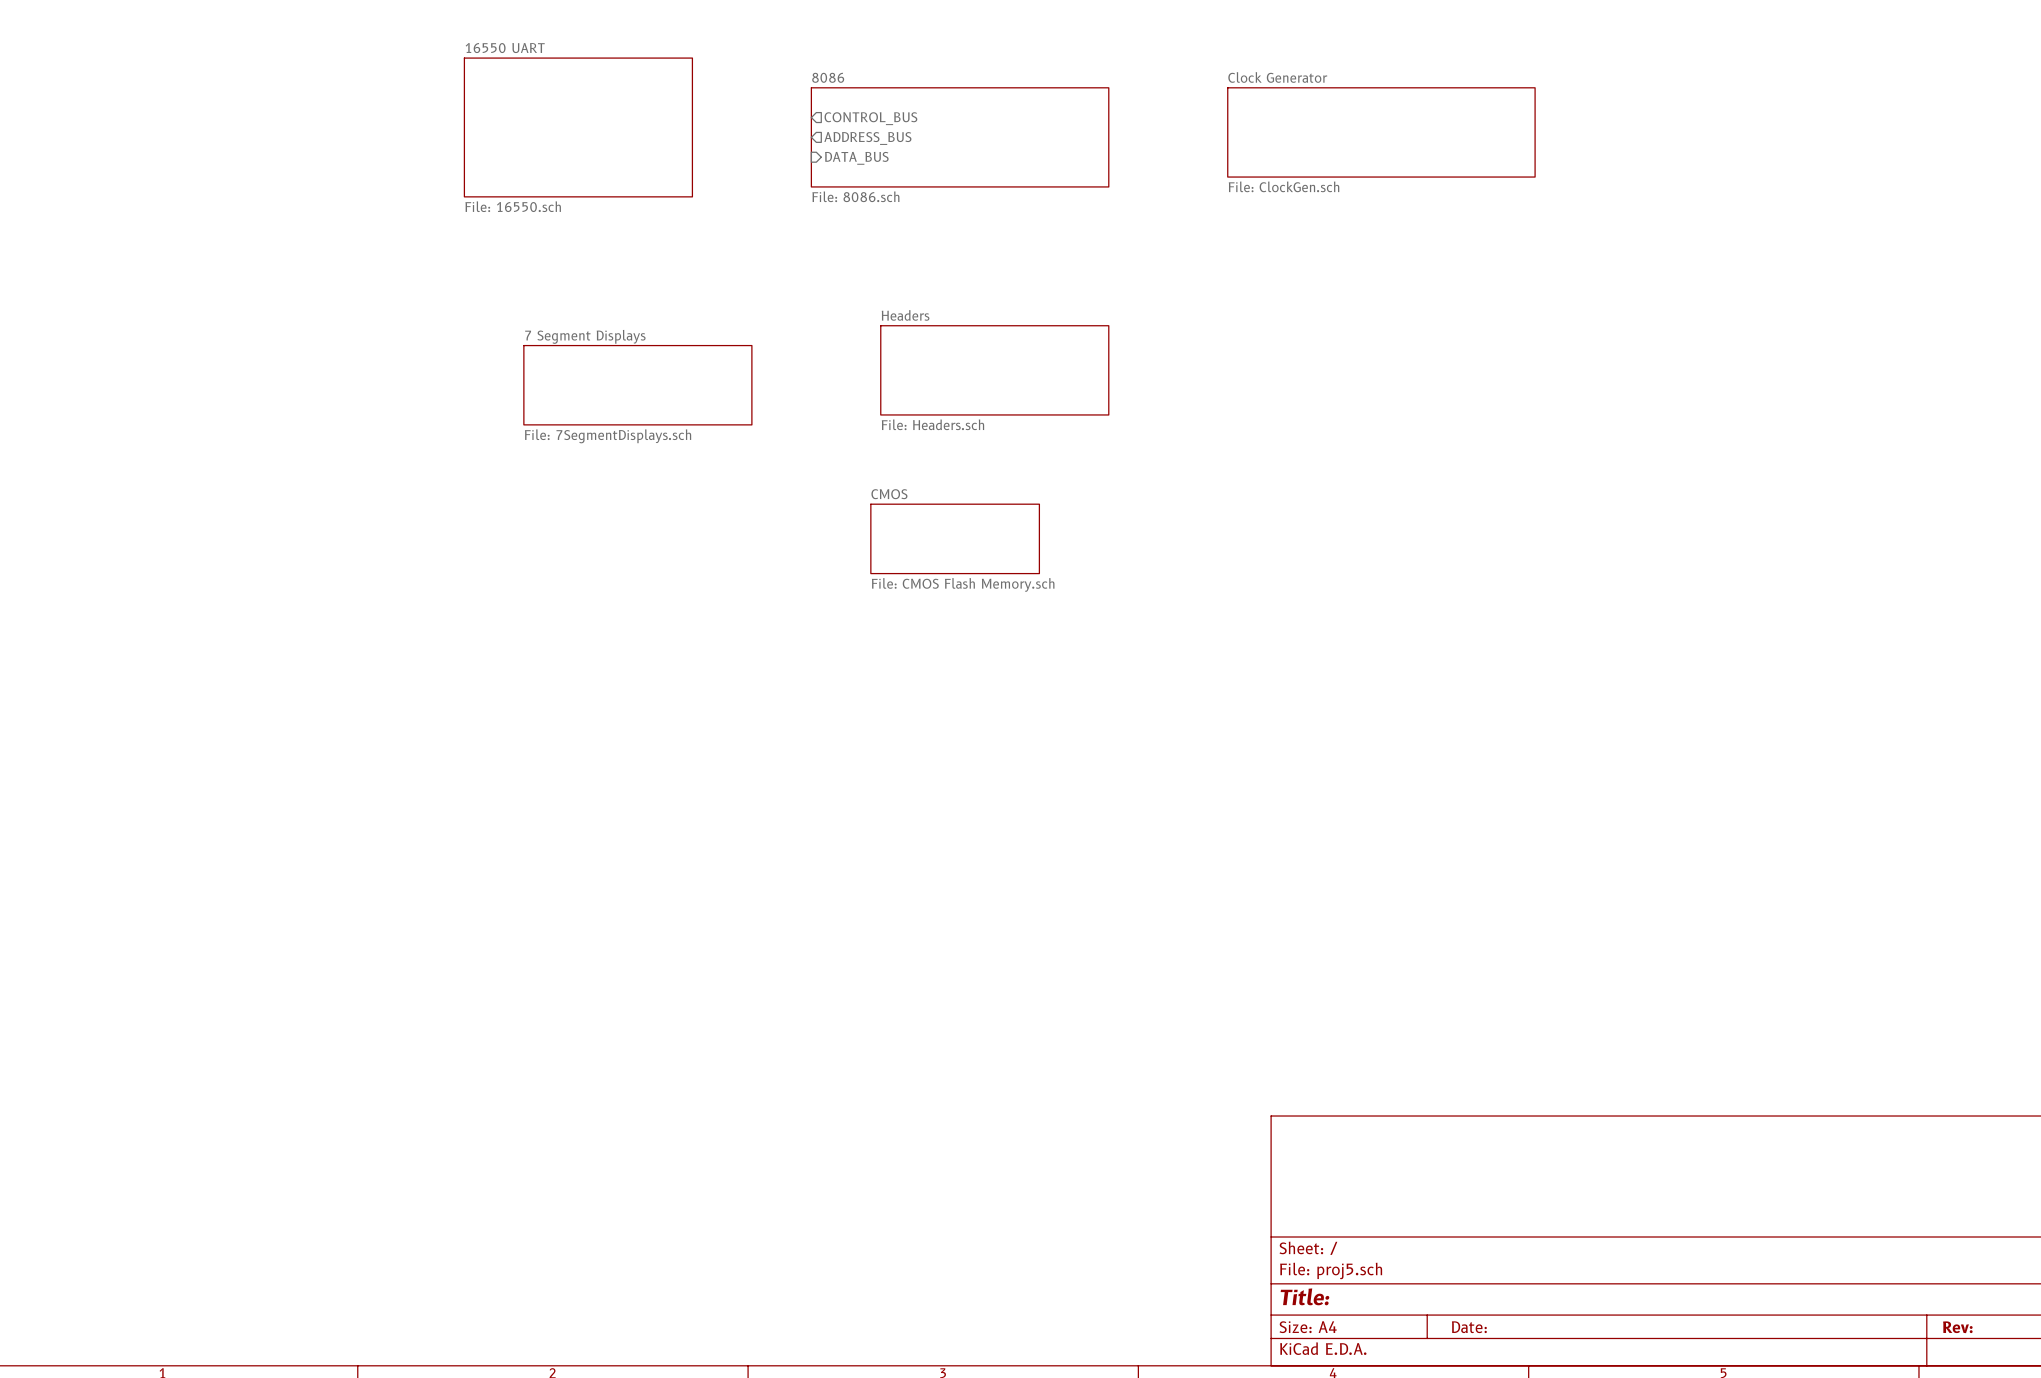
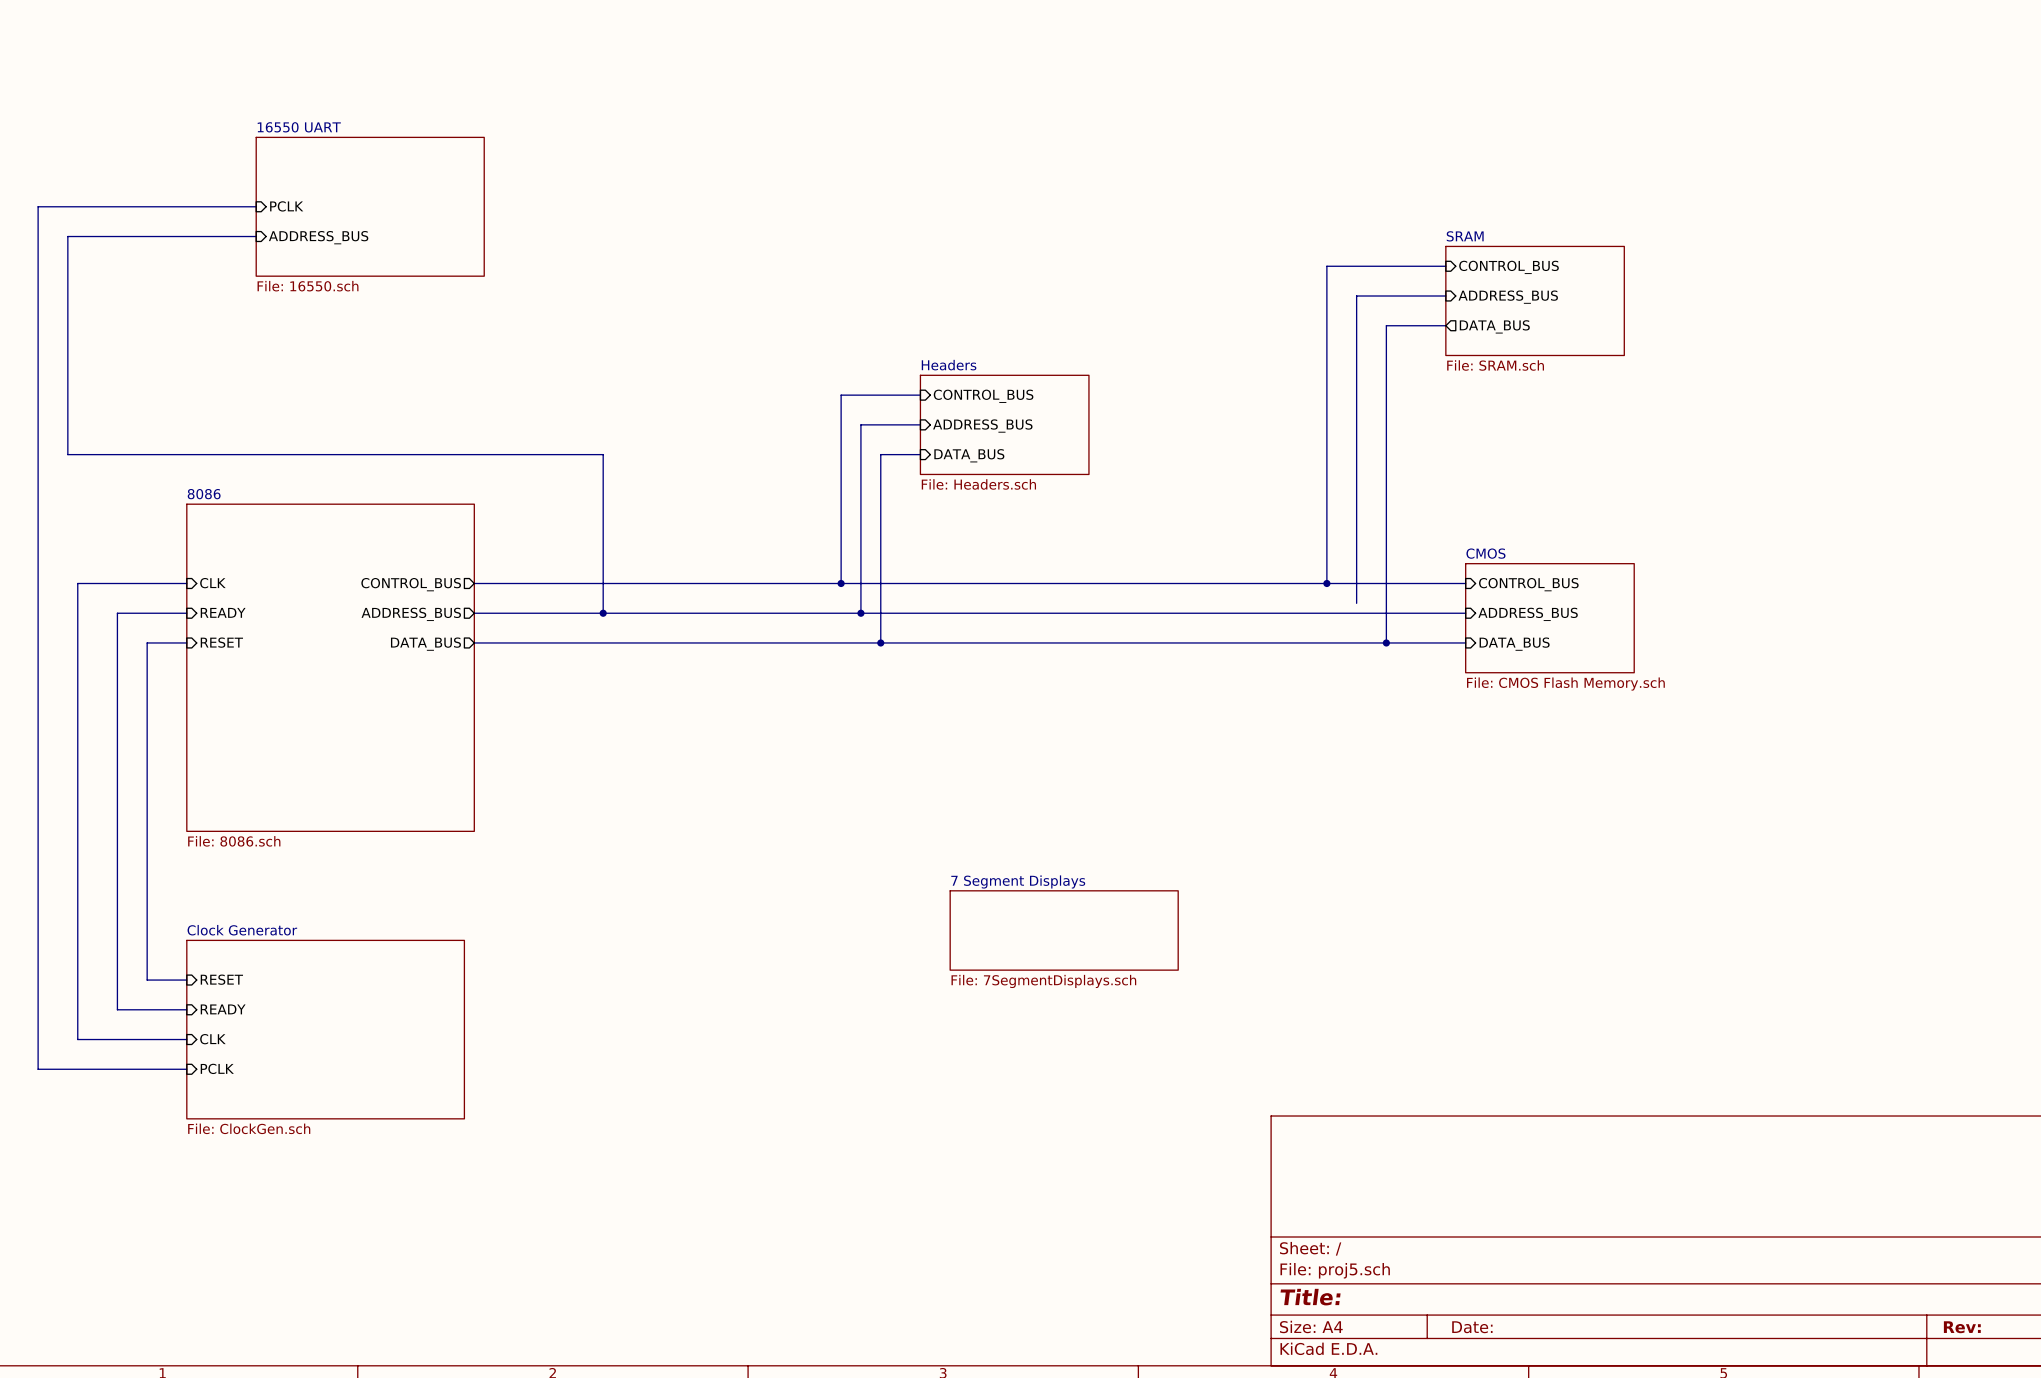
sheet 8086 name position: 8086 (828, 77) -> 8086 (204, 494)
sheet 8086 shape: [811, 87, 1109, 187] -> [186, 504, 475, 832]
sheet pin: CONTROL_BUS (870, 118) -> none
sheet 16550 UART position: (578, 127) -> (370, 206)
sheet Clock Generator: File: ClockGen.sch (1381, 132) -> none
sheet pin: ADDRESS_BUS (867, 138) -> none
sheet pin: DATA_BUS (856, 158) -> none
sheet 8086 value position: File: 8086.sch (855, 196) -> File: 8086.sch (234, 841)
wire: none -> (256, 206) (38, 206) (38, 1069) (186, 1069)
sheet pin: none -> PCLK (286, 206)
wire: none -> (256, 236) (67, 236) (67, 454) (603, 454) (603, 613)
sheet pin: none -> ADDRESS_BUS (318, 237)
wire: none -> (1445, 266) (1326, 266) (1326, 583)
sheet pin: none -> CONTROL_BUS (1509, 267)
wire: none -> (1445, 296) (1356, 296) (1356, 603)
sheet pin: none -> ADDRESS_BUS (1508, 297)
sheet SRAM: none -> File: SRAM.sch (1535, 300)
wire: none -> (1445, 325) (1386, 325) (1386, 642)
sheet pin: none -> DATA_BUS (1494, 326)
sheet Headers: File: Headers.sch (994, 370) -> none
sheet 7 Segment Displays position: (637, 385) -> (1064, 930)
wire: none -> (920, 395) (841, 395) (841, 583)
sheet pin: none -> CONTROL_BUS (983, 396)
wire: none -> (920, 424) (860, 424) (860, 613)
sheet Headers: none -> File: Headers.sch (1004, 424)
sheet pin: none -> ADDRESS_BUS (982, 426)
wire: none -> (920, 454) (880, 454) (880, 642)
sheet pin: none -> DATA_BUS (969, 455)
sheet CMOS: File: CMOS Flash Memory.sch (955, 538) -> none
wire: none -> (186, 583) (77, 583) (77, 1039) (186, 1039)
sheet pin: none -> CLK (212, 583)
wire: none -> (474, 583) (1465, 583)
junction: none -> (841, 583)
junction: none -> (1326, 583)
sheet pin: none -> CONTROL_BUS (411, 584)
sheet pin: none -> CONTROL_BUS (1528, 584)
sheet pin: none -> READY (223, 612)
wire: none -> (186, 613) (117, 613) (117, 1009) (186, 1009)
wire: none -> (474, 613) (1465, 613)
junction: none -> (603, 613)
junction: none -> (860, 613)
sheet pin: none -> ADDRESS_BUS (411, 614)
sheet pin: none -> ADDRESS_BUS (1528, 614)
sheet CMOS: none -> File: CMOS Flash Memory.sch (1549, 618)
wire: none -> (186, 642) (147, 642) (147, 980) (186, 980)
sheet pin: none -> RESET (221, 642)
wire: none -> (474, 642) (1465, 642)
junction: none -> (880, 642)
junction: none -> (1386, 642)
sheet pin: none -> DATA_BUS (425, 644)
sheet pin: none -> DATA_BUS (1514, 644)
sheet pin: none -> RESET (221, 979)
sheet pin: none -> READY (223, 1009)
sheet Clock Generator: none -> File: ClockGen.sch (325, 1029)
sheet pin: none -> CLK (212, 1039)
sheet pin: none -> PCLK (217, 1068)

